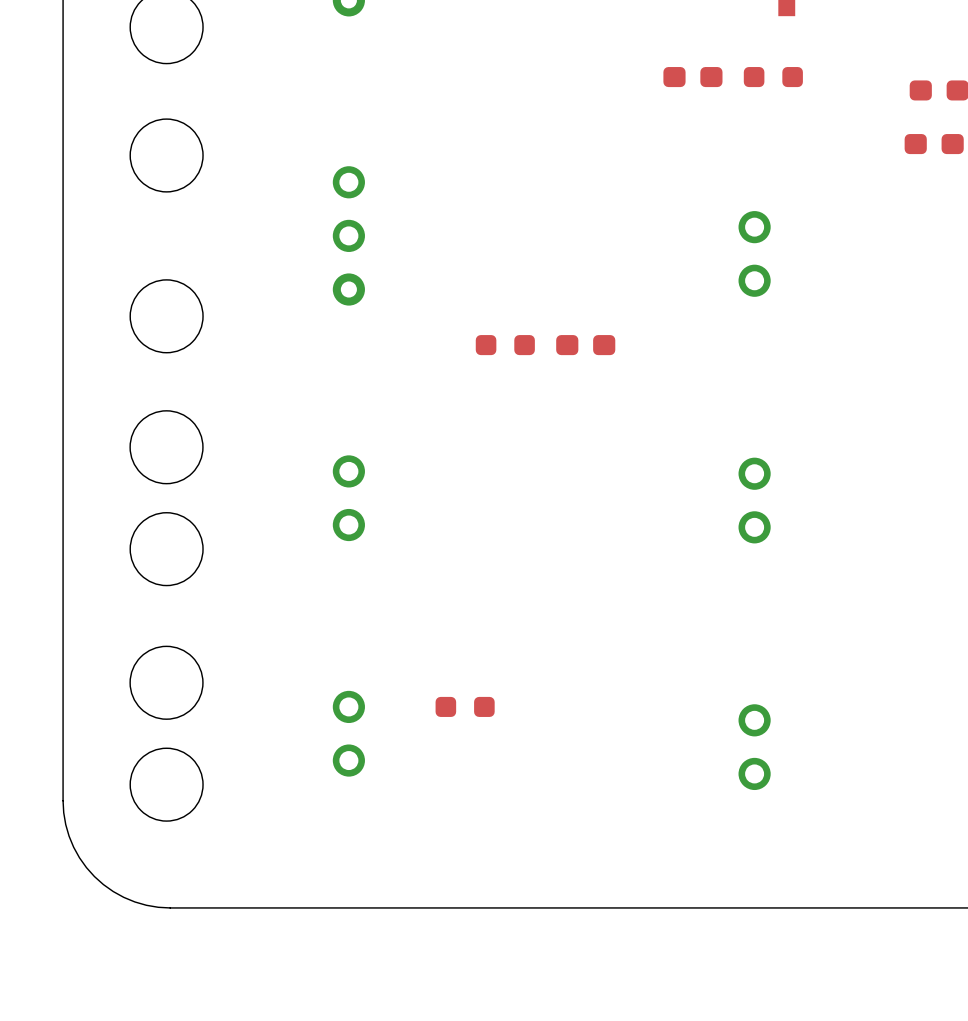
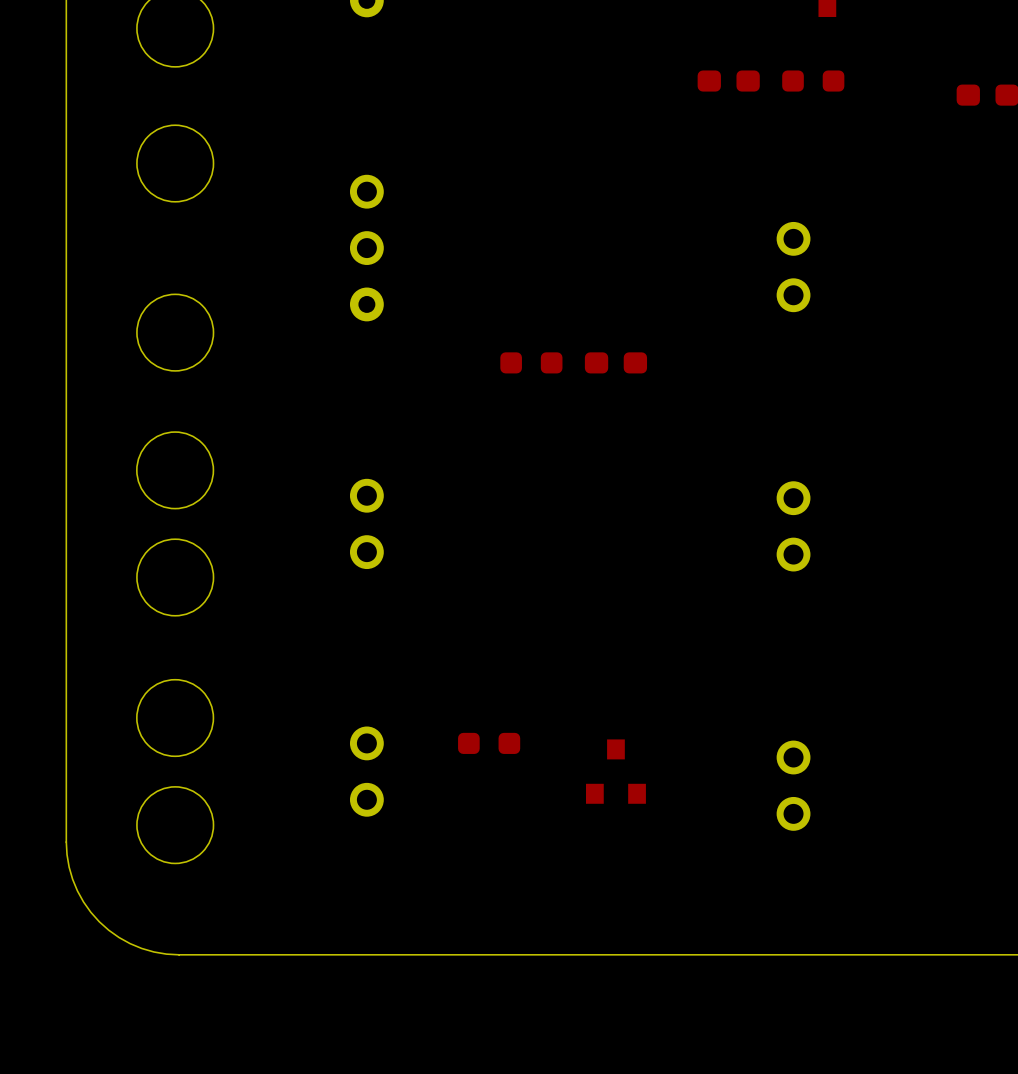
part: (934, 144) -> none
part: none -> (615, 771)

